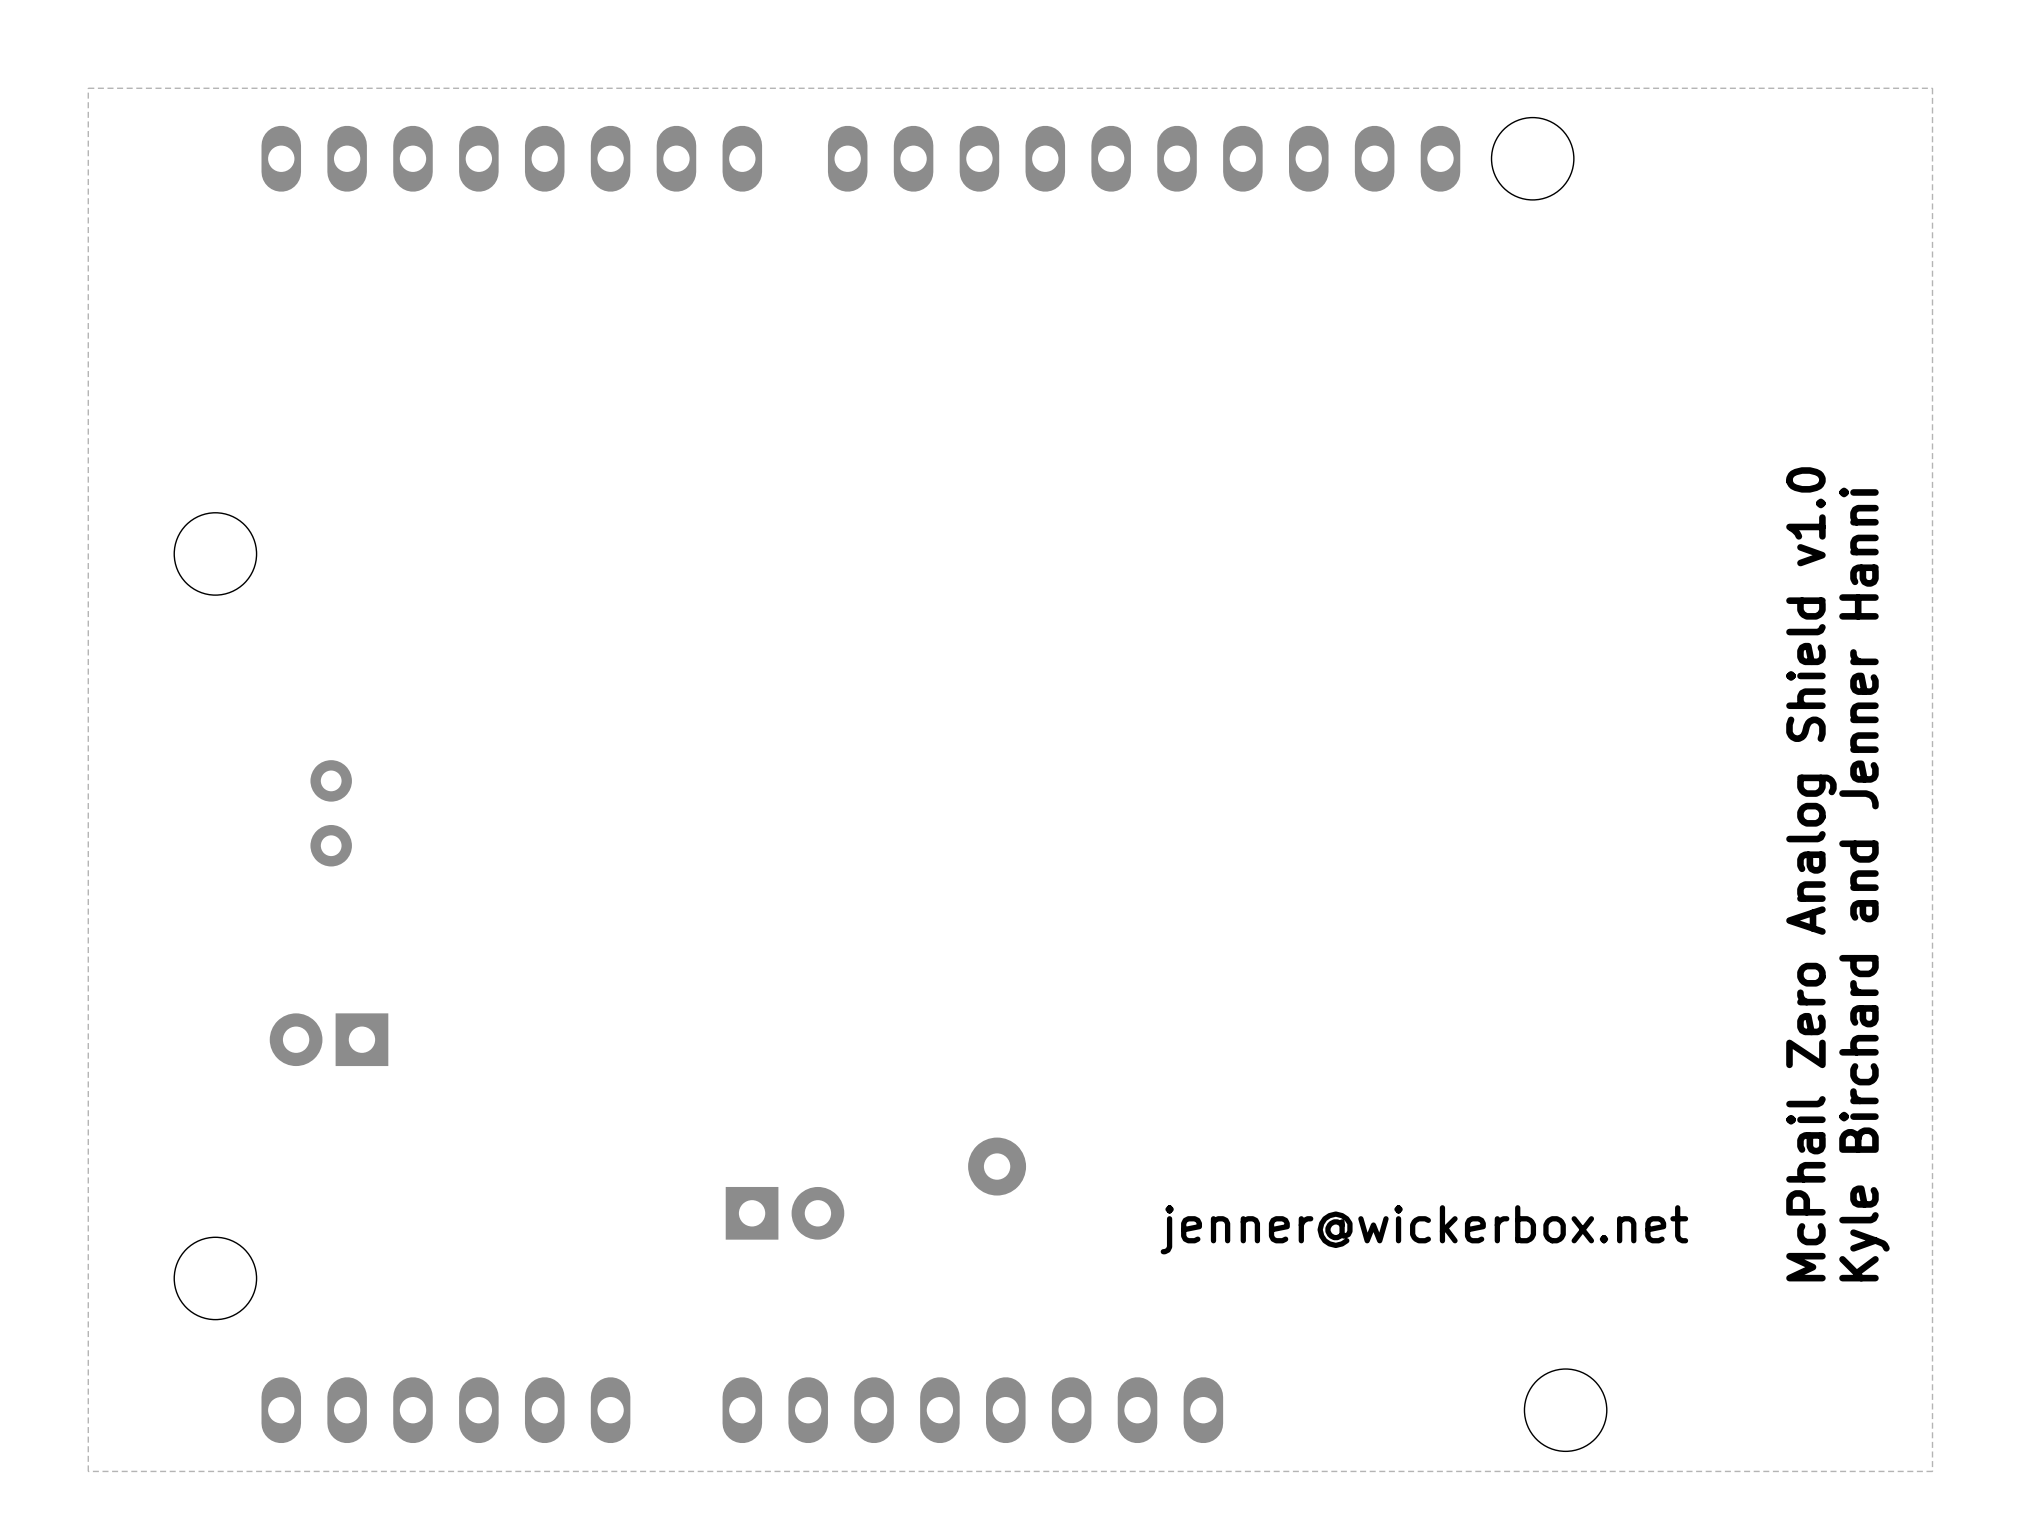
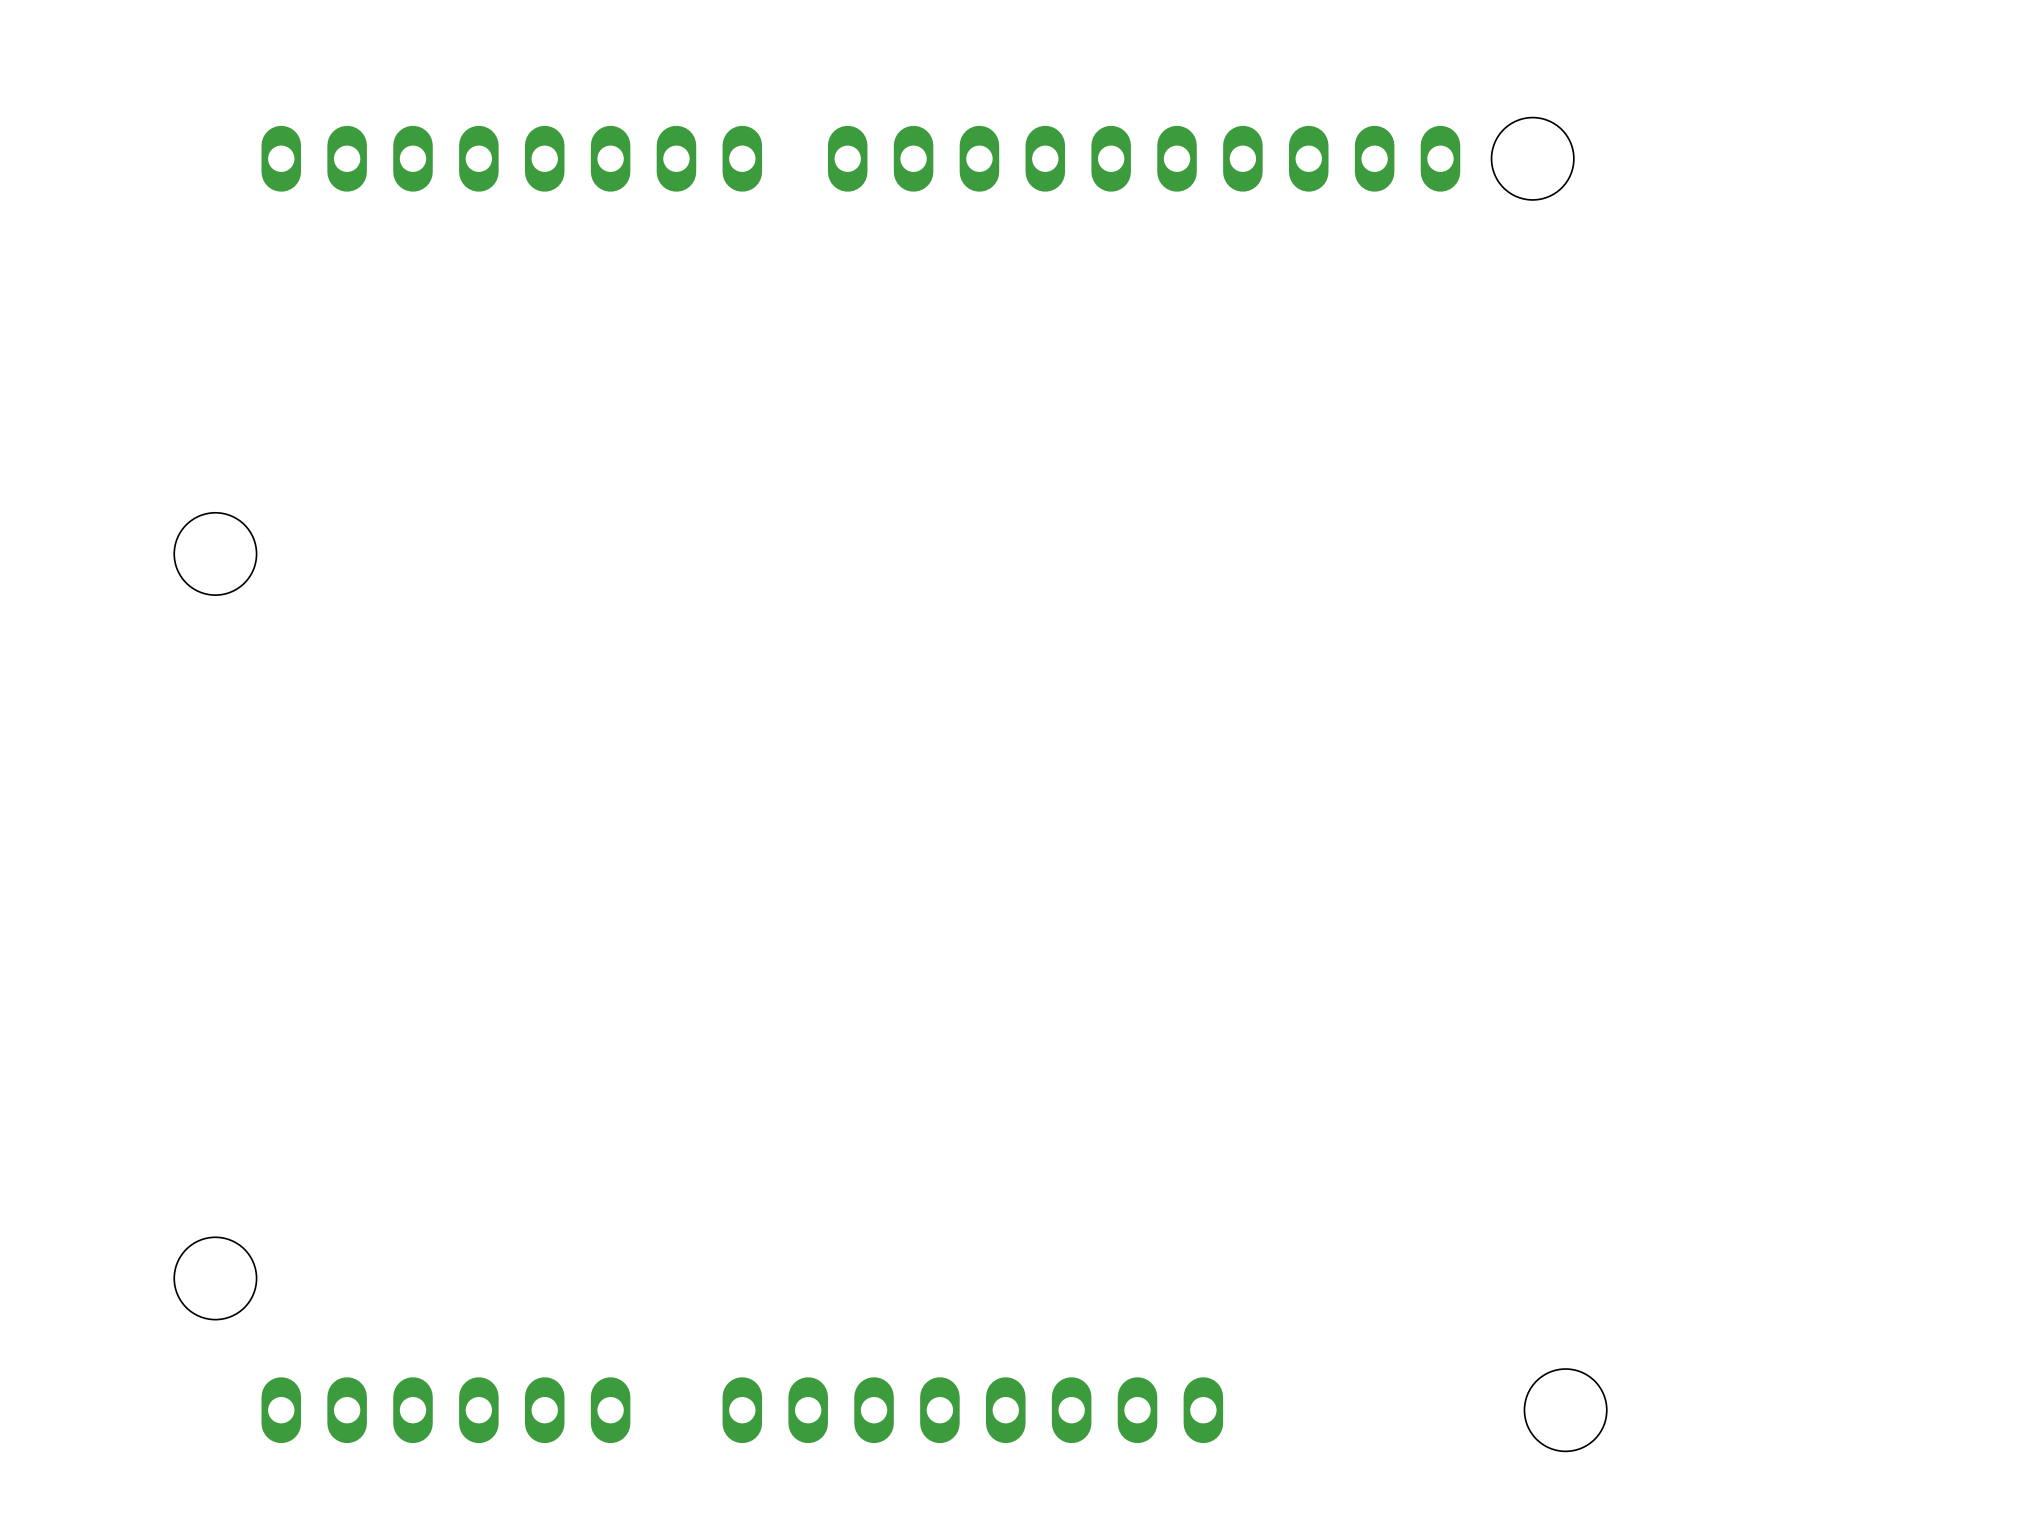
zone outline: (1932, 88) (88, 88) (88, 1471) (1932, 1471) (1932, 88) -> none
part: (331, 813) -> none
text: McPhail Zero Analog Shield v1.0 (1811, 874) -> none
text: Kyle Birchard and Jenner Hanni (1864, 884) -> none
part: (329, 1039) -> none
part: (997, 1166) -> none
part: (785, 1213) -> none
text: jenner@wickerbox.net (1424, 1229) -> none

